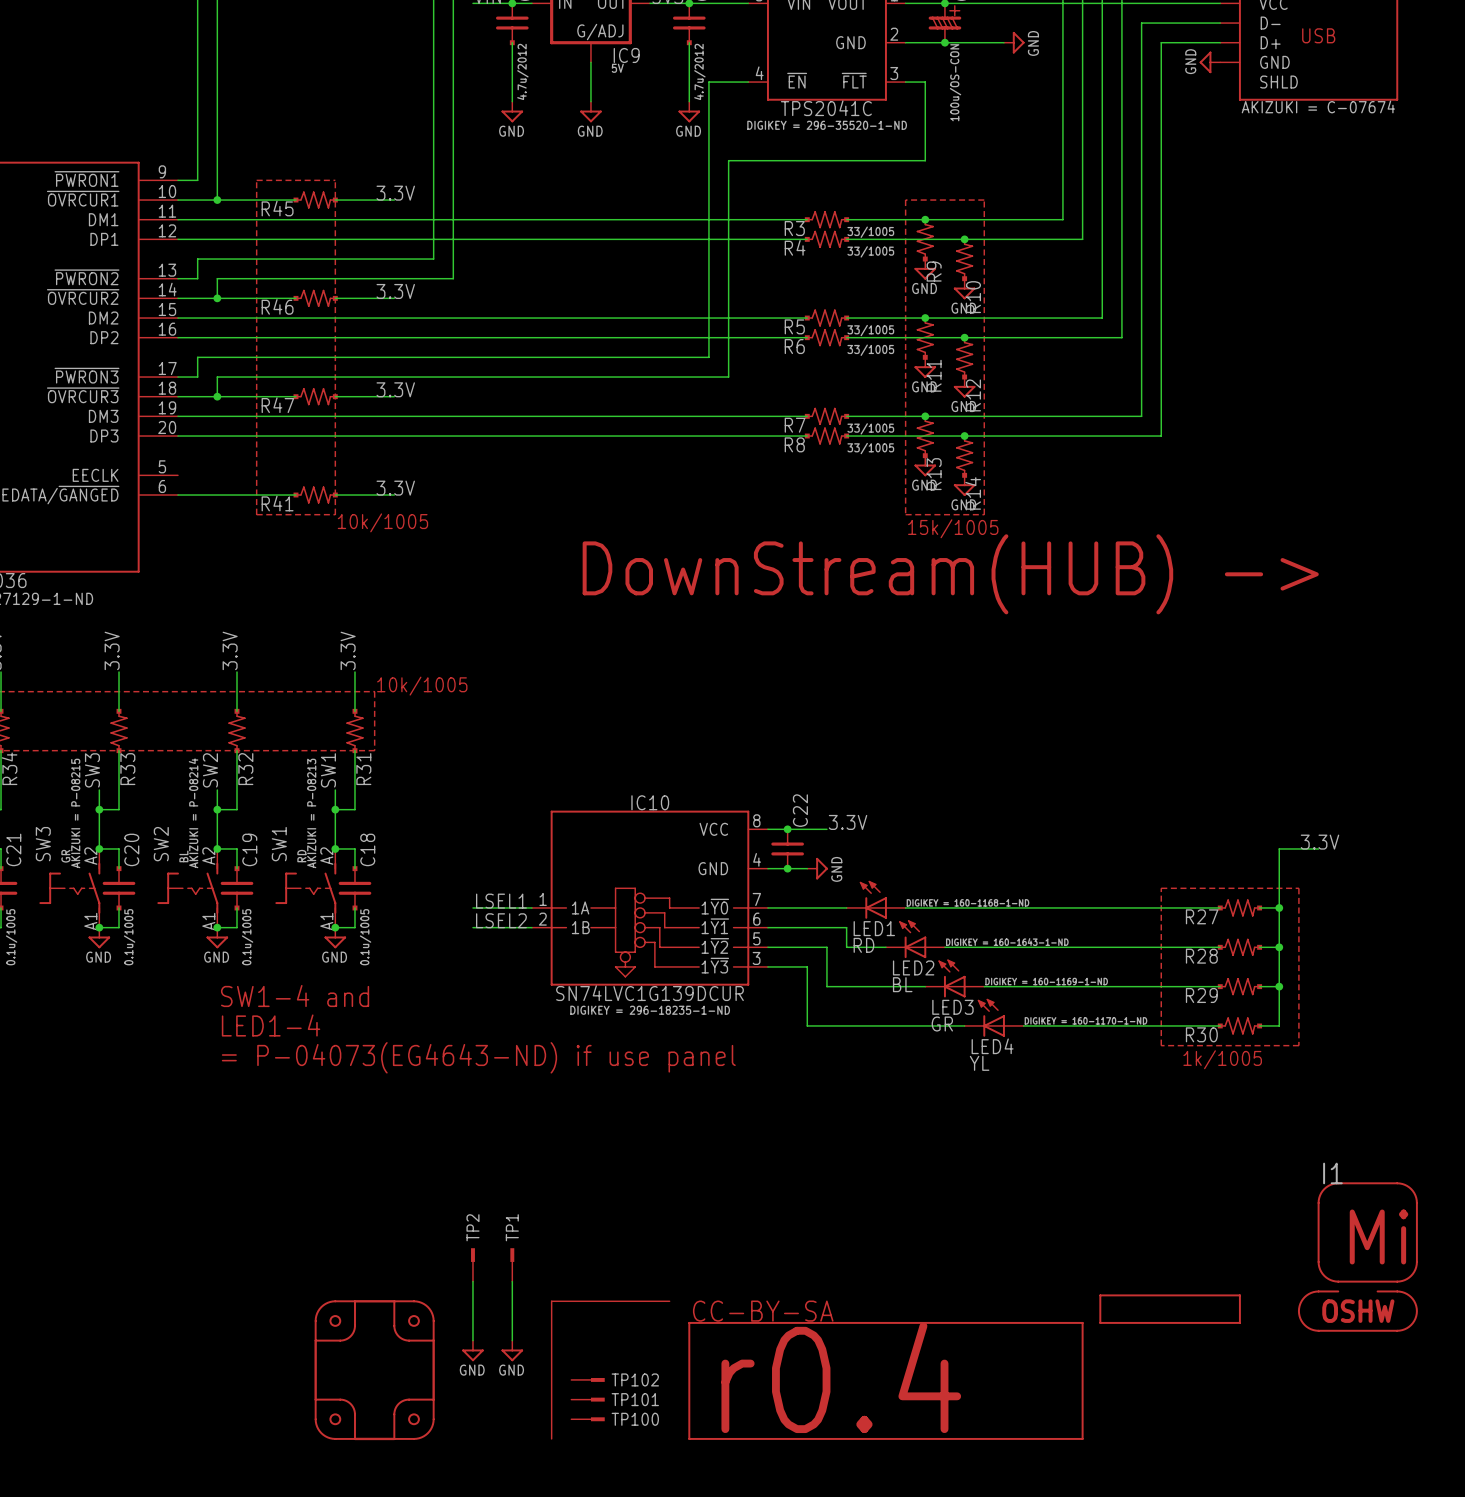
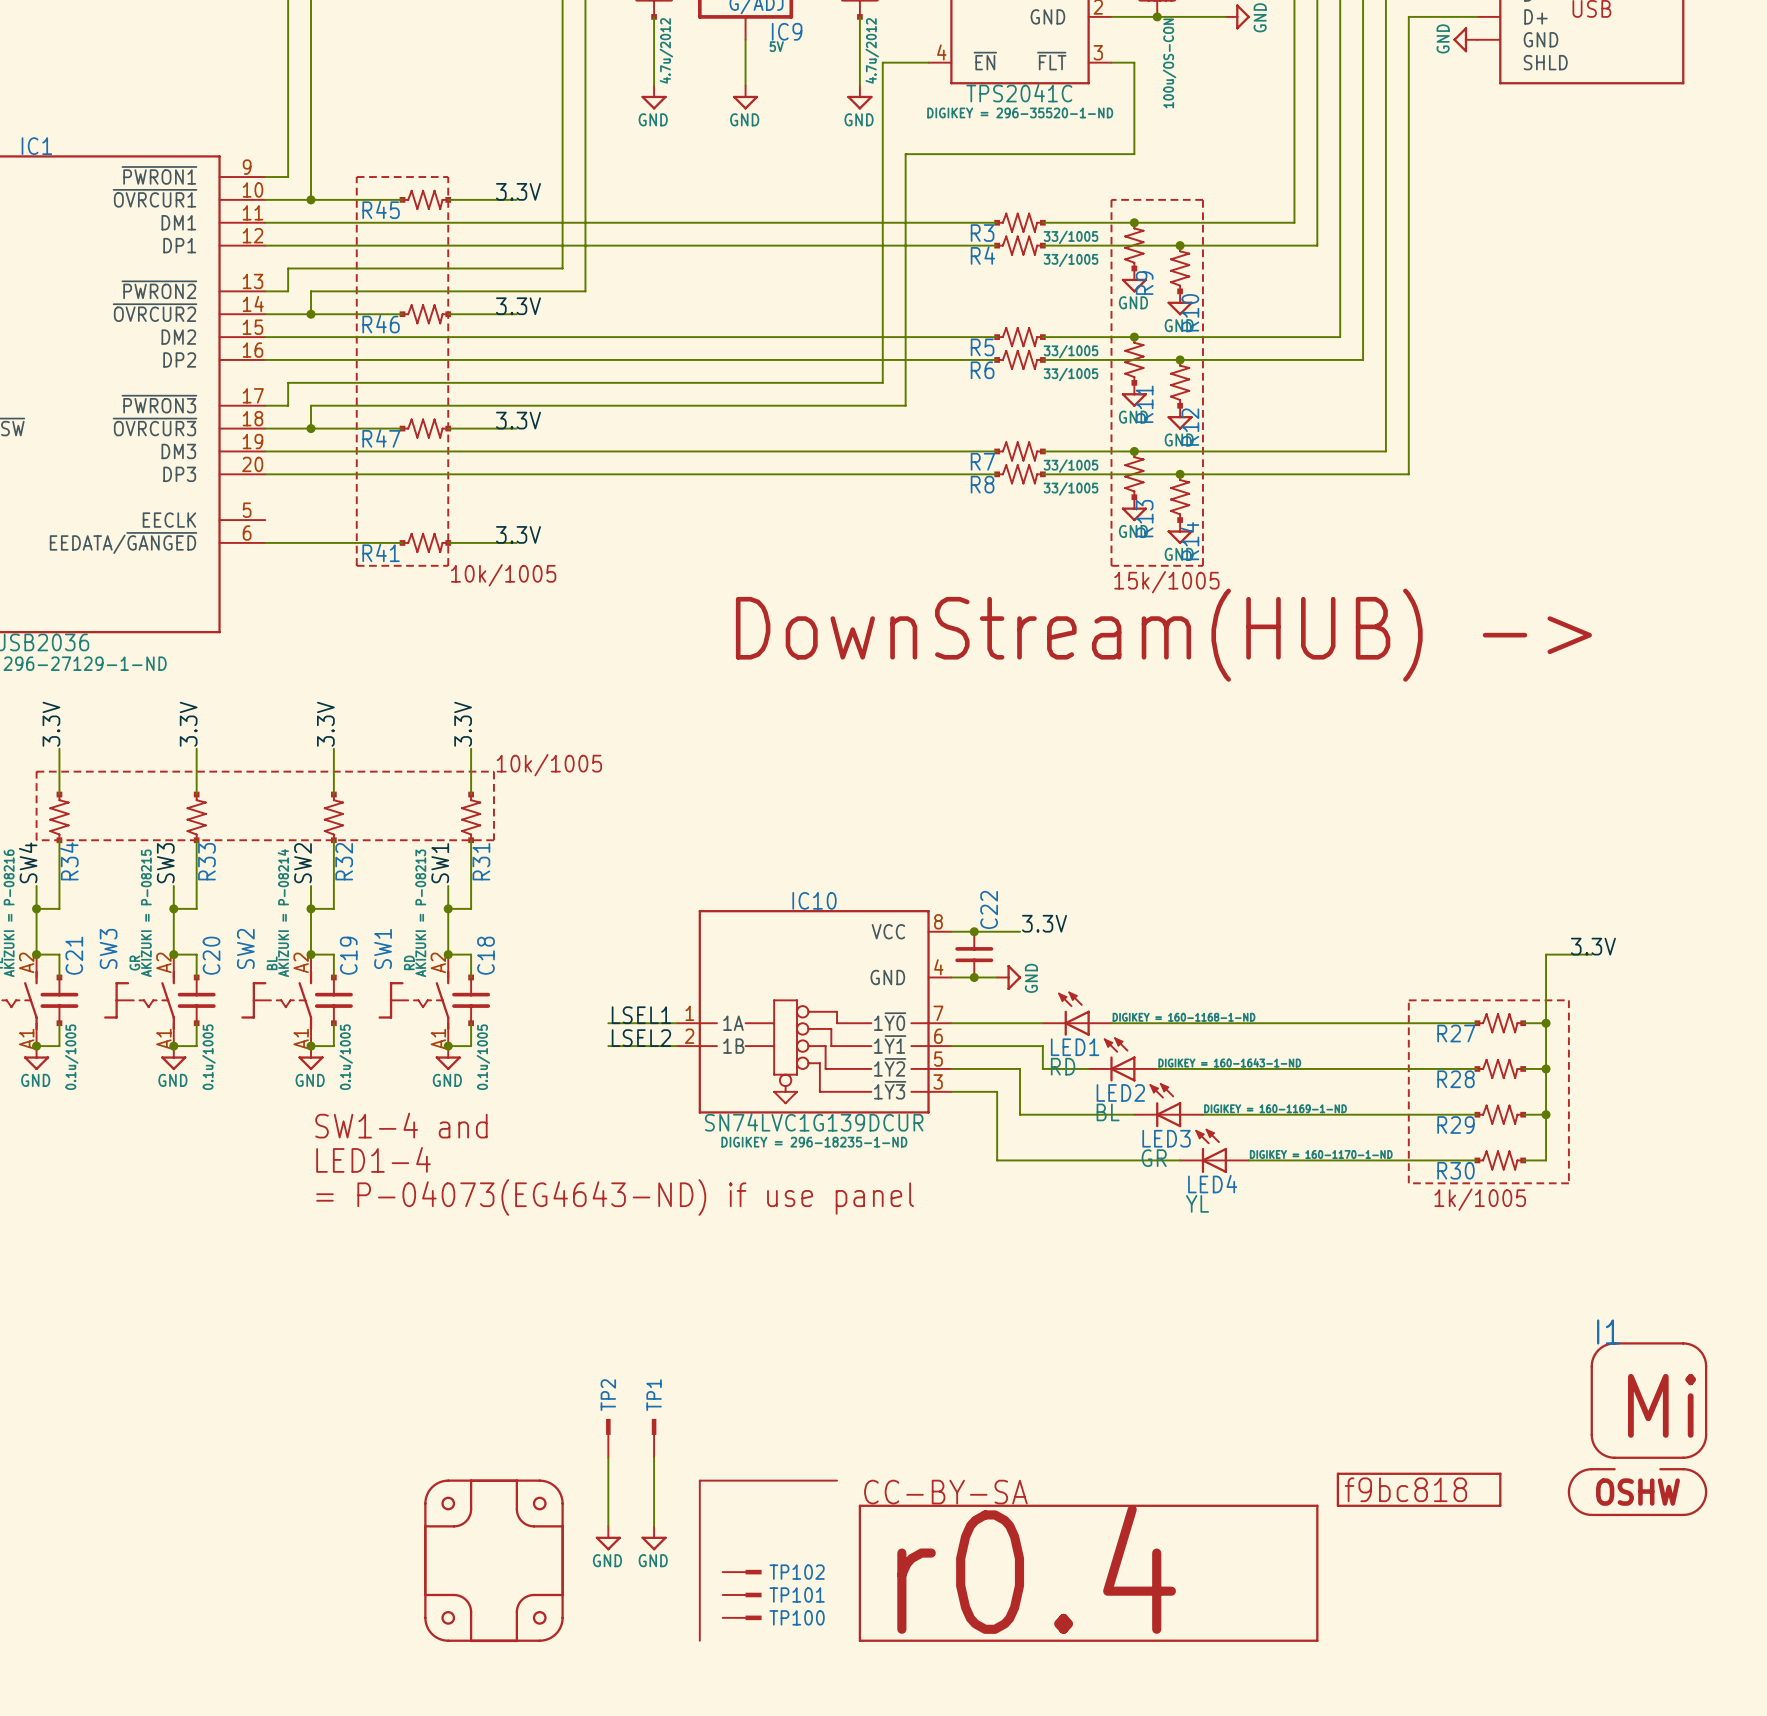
part text: AKIZUKI = C-07674 (1318, 106) -> none
part value: none -> f9bc818 (1405, 1489)

